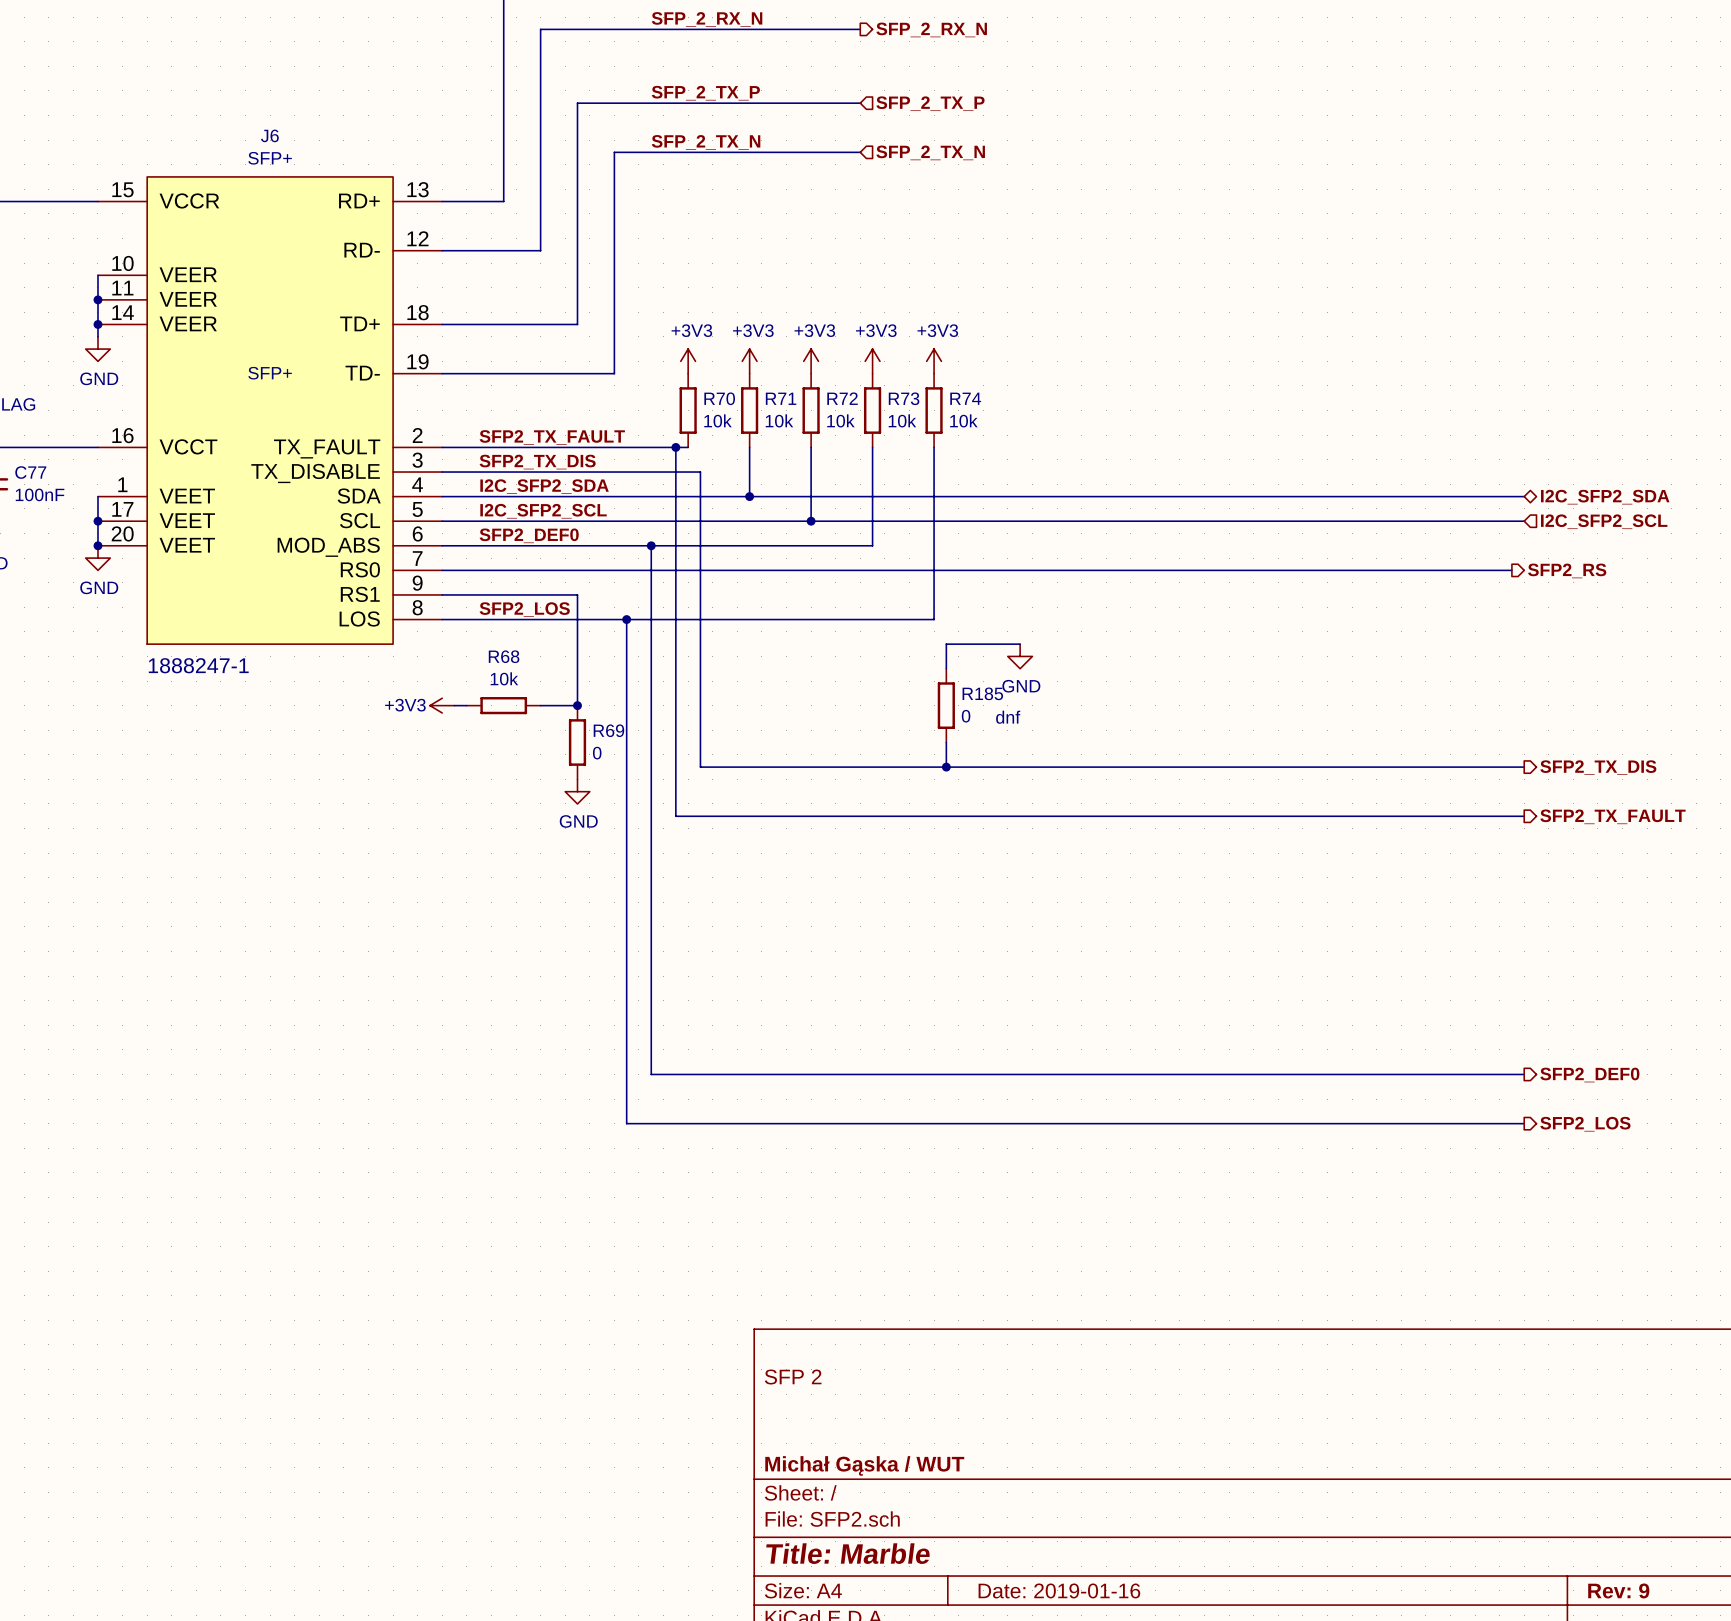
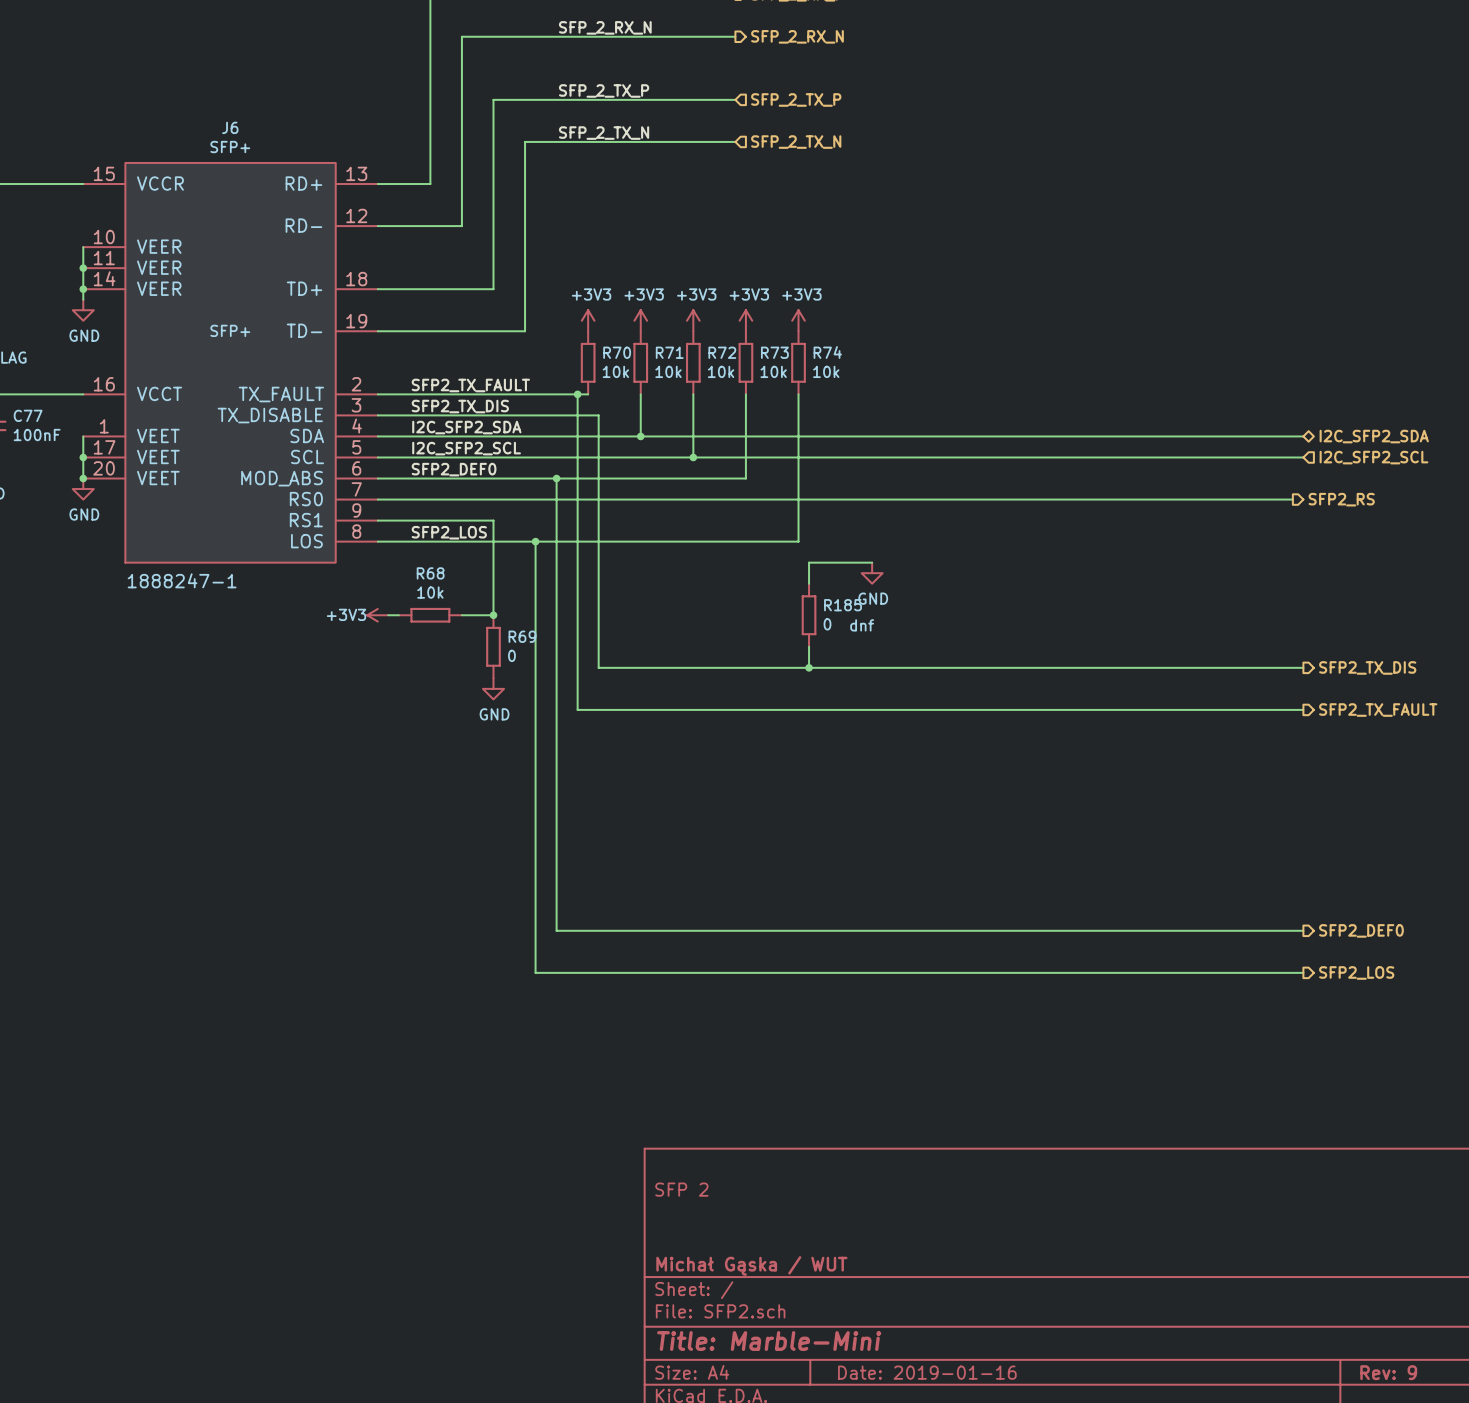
title block: Title: Marble (848, 1553) -> Title: Marble-Mini (769, 1341)

